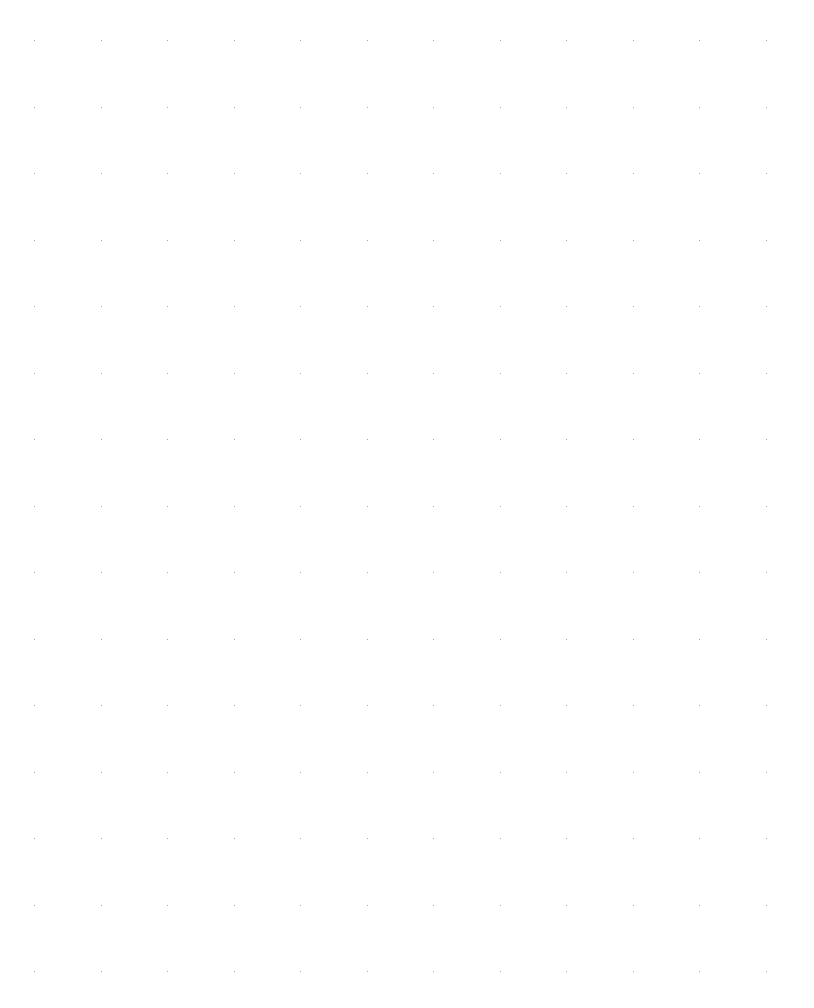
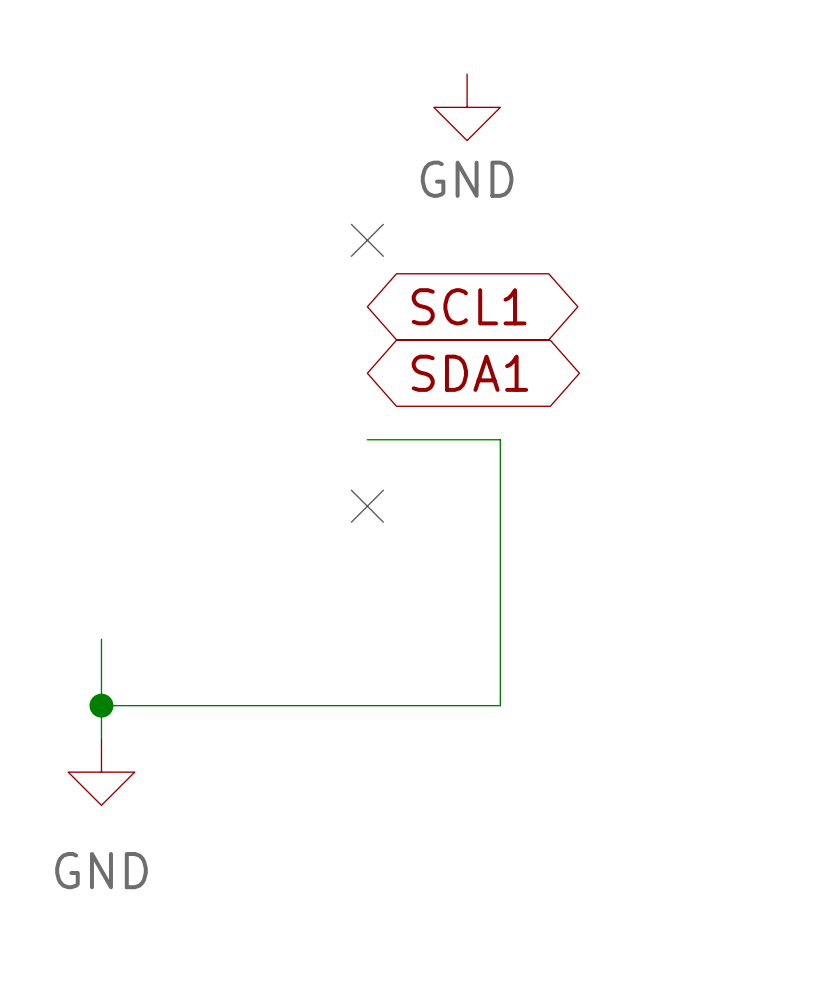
power symbol: none -> GND (467, 107)
no-connect mark: none -> (367, 240)
global label: none -> SCL1 (469, 306)
global label: none -> SDA1 (469, 373)
wire: none -> (367, 439) (500, 439) (500, 705) (101, 705)
no-connect mark: none -> (367, 506)
wire: none -> (101, 639) (101, 738)
junction: none -> (101, 705)
power symbol: none -> GND (101, 772)

